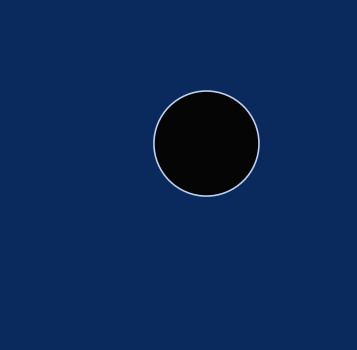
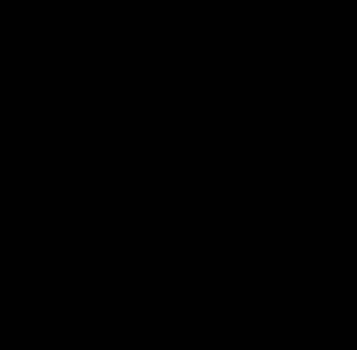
part: (206, 143) -> none

